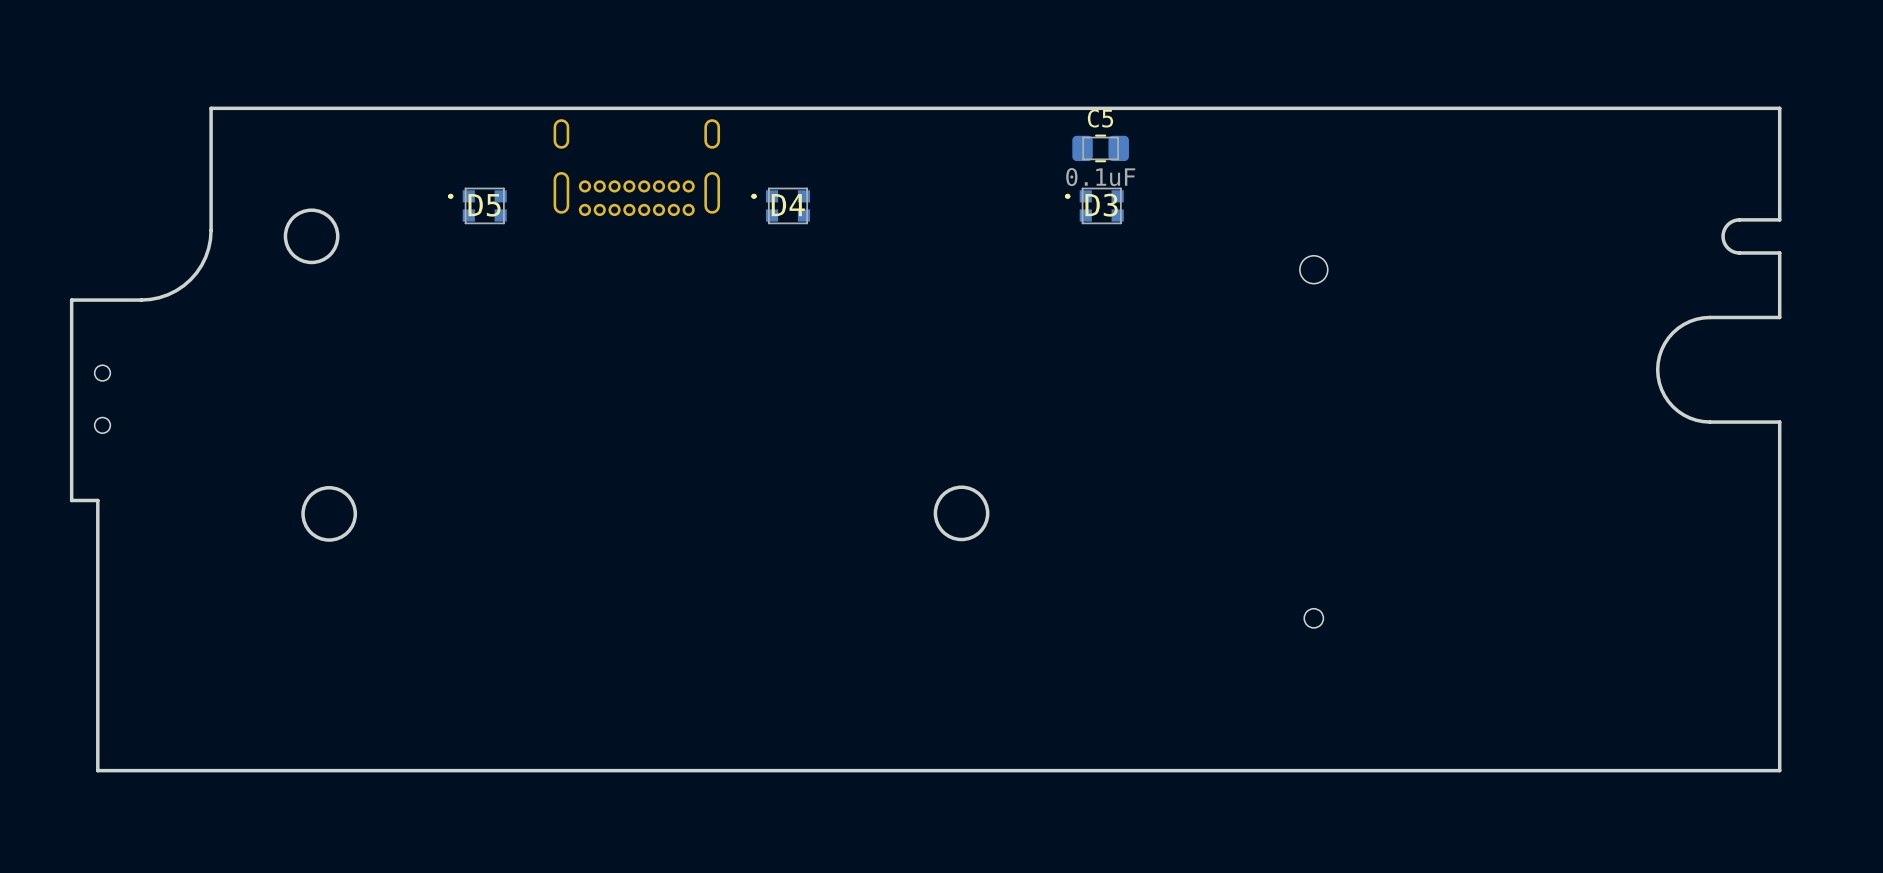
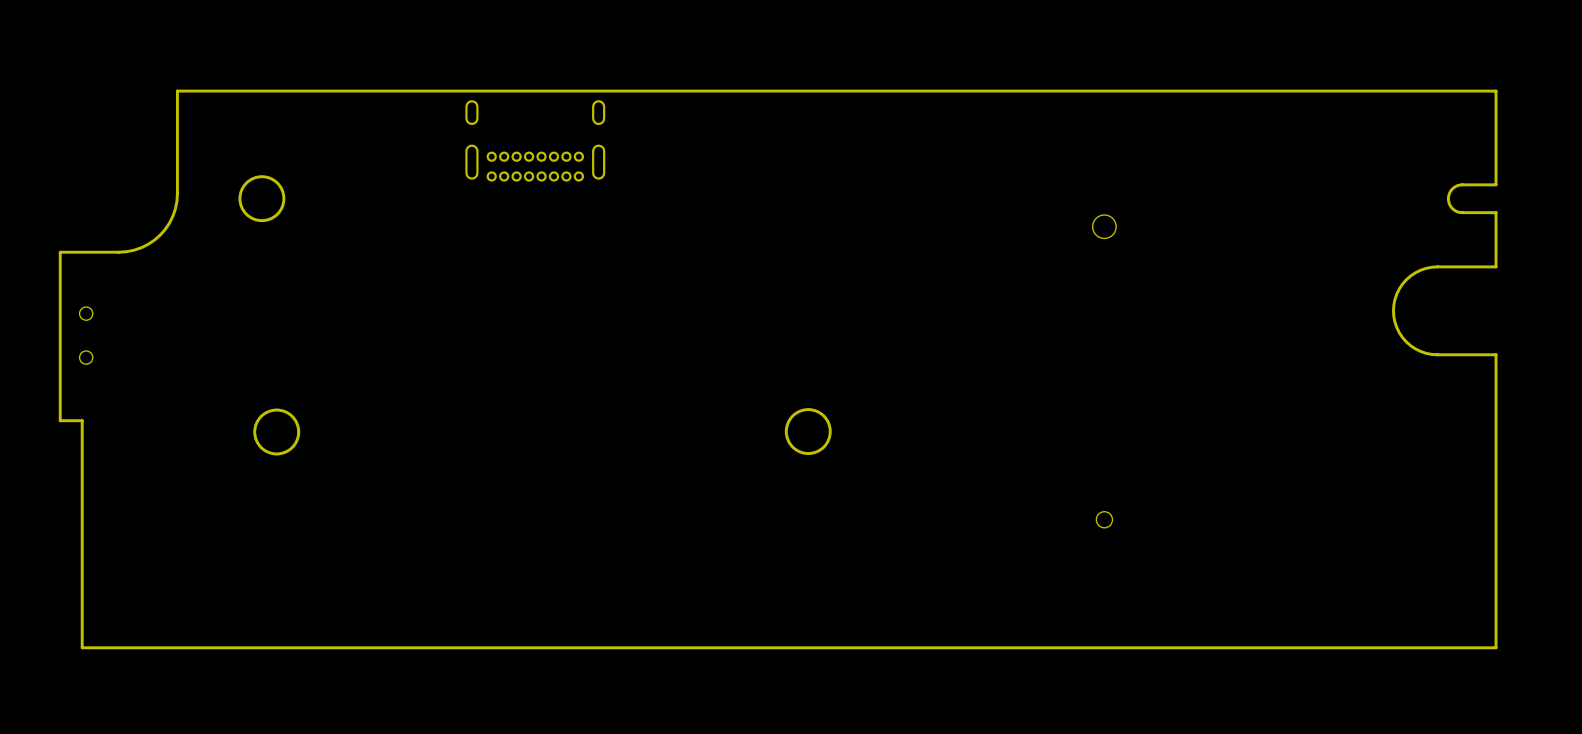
C5: 0.1uF (1100, 148) -> none
D5: (477, 205) -> none
D4: (780, 205) -> none
D3: (1094, 205) -> none

